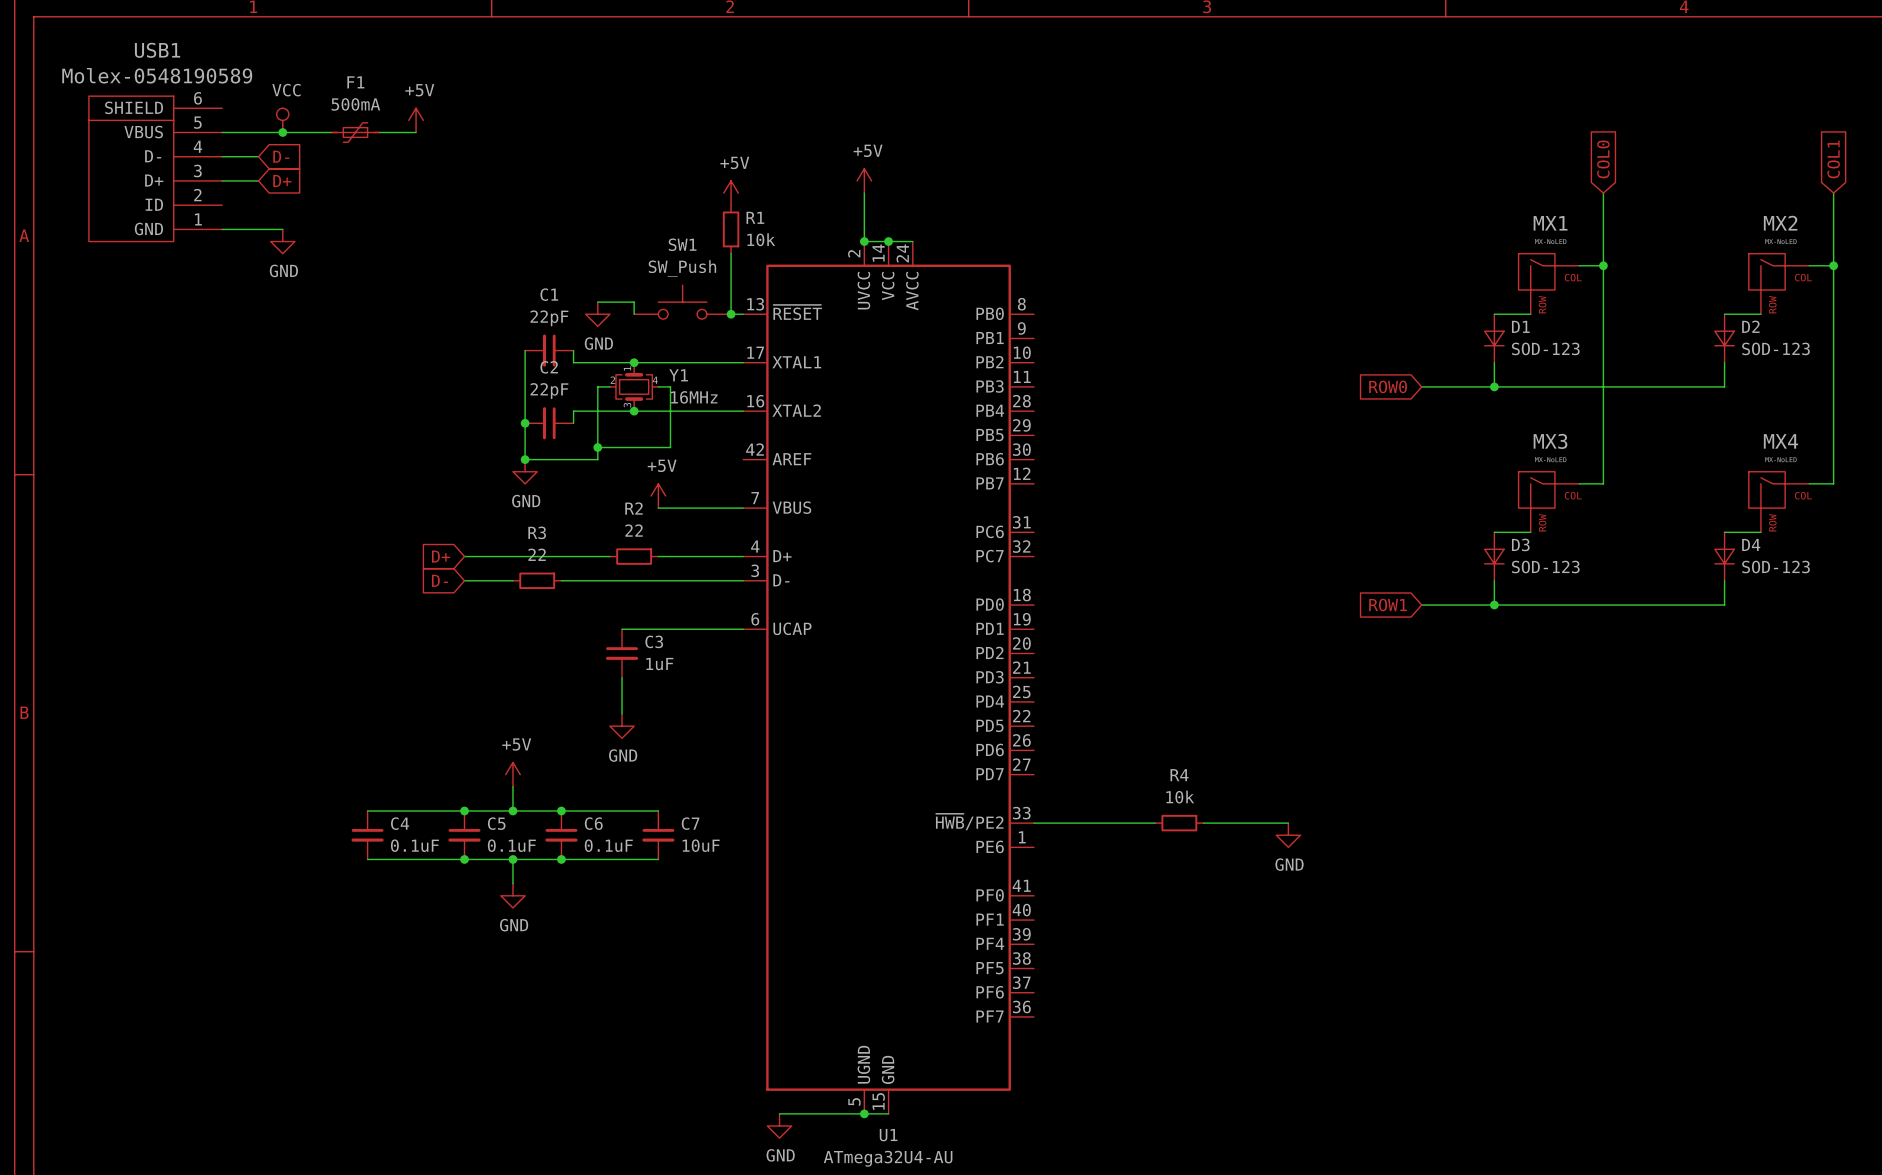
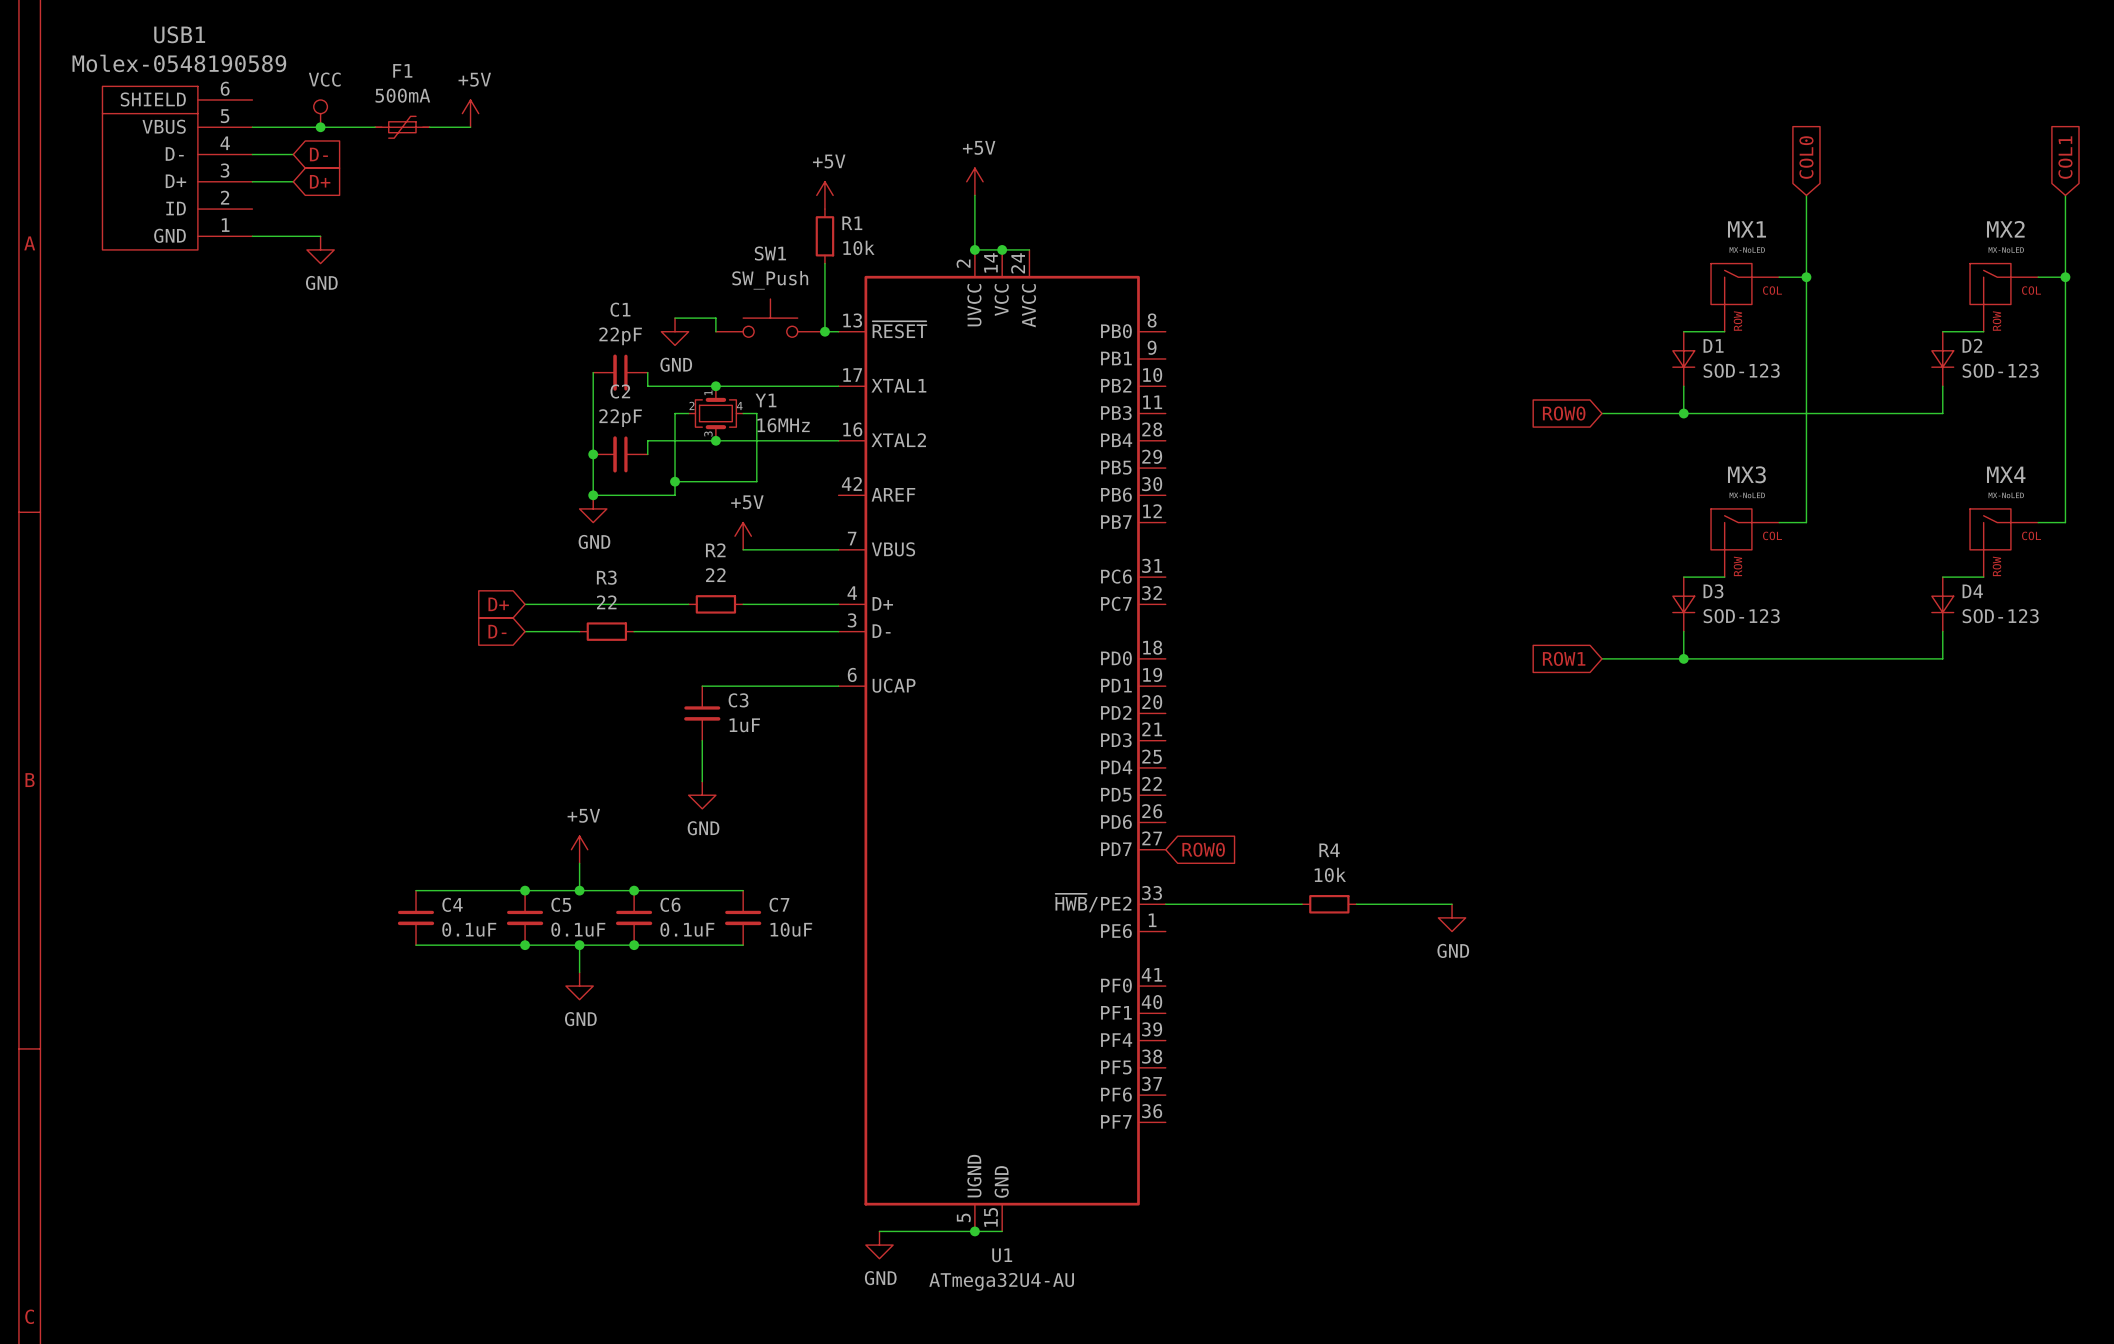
global label: none -> ROW0 (1203, 849)

